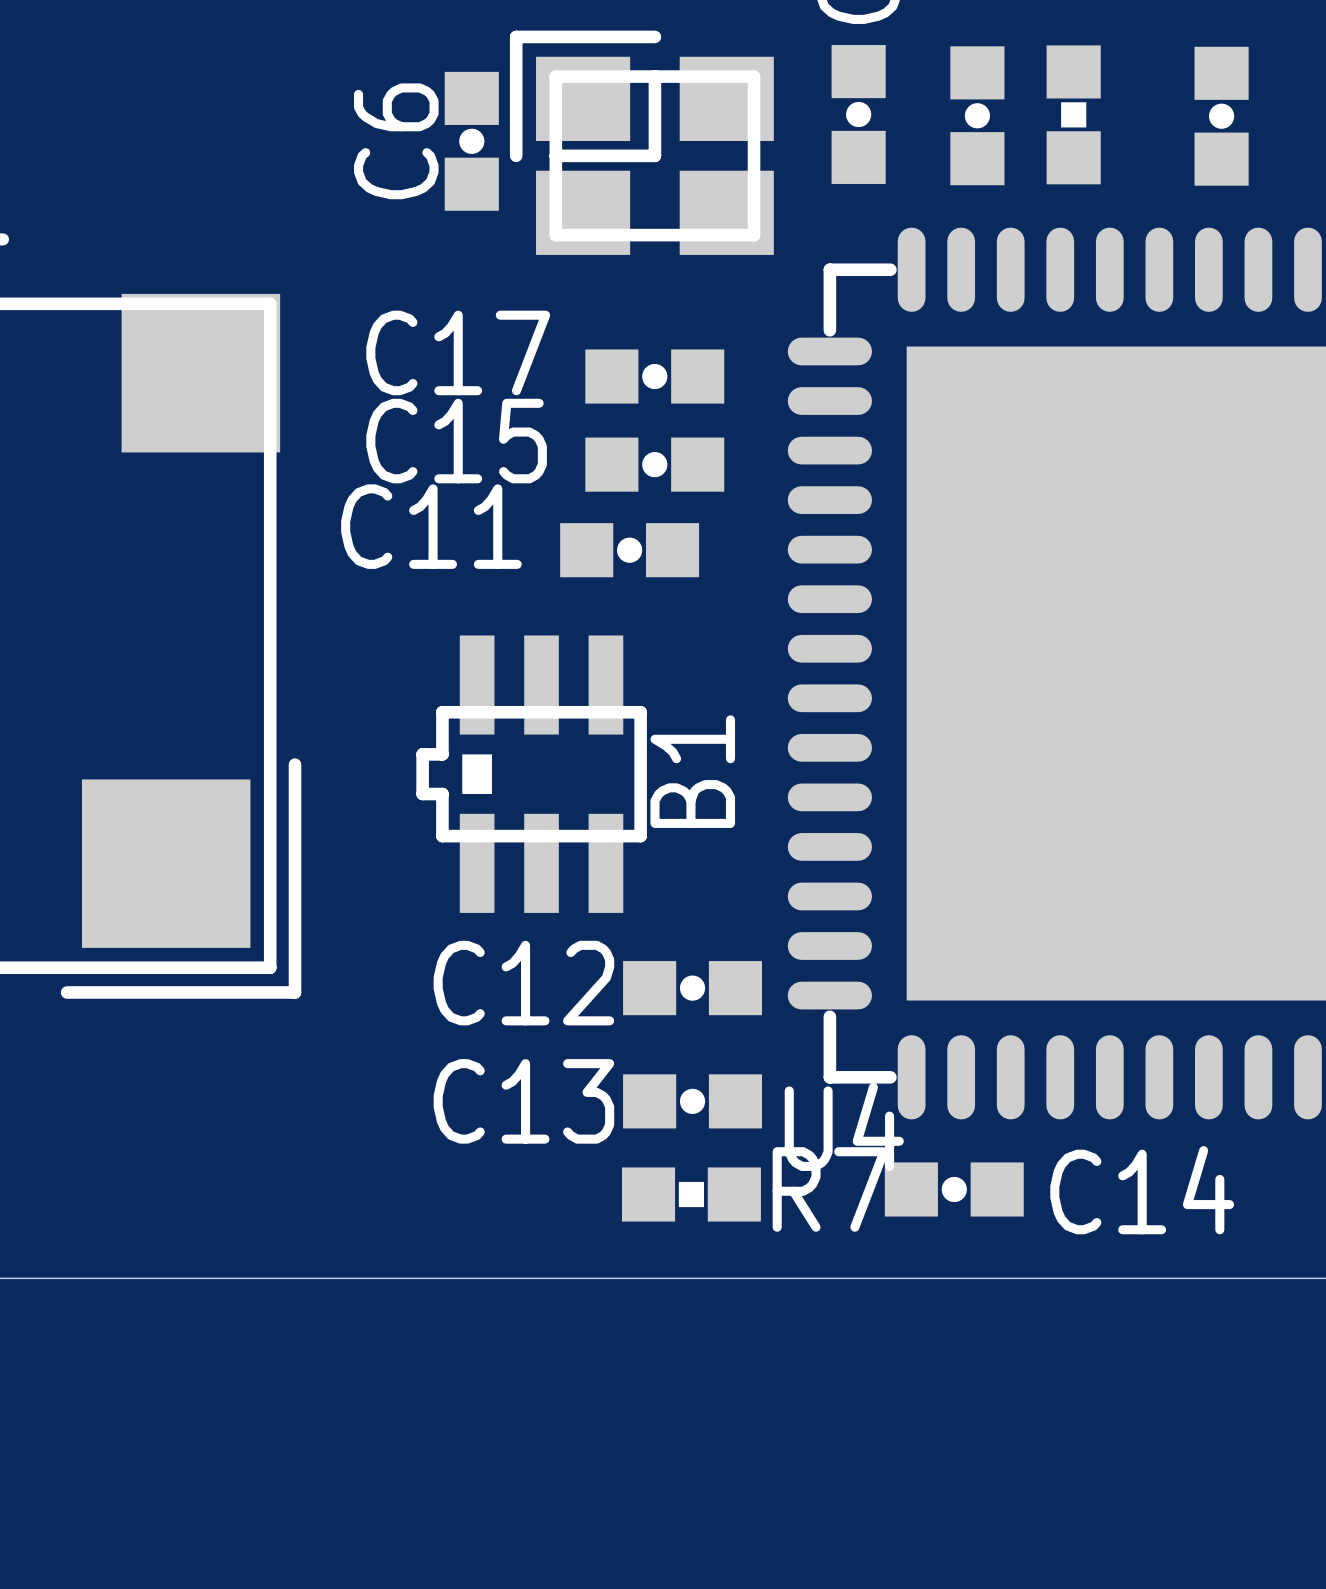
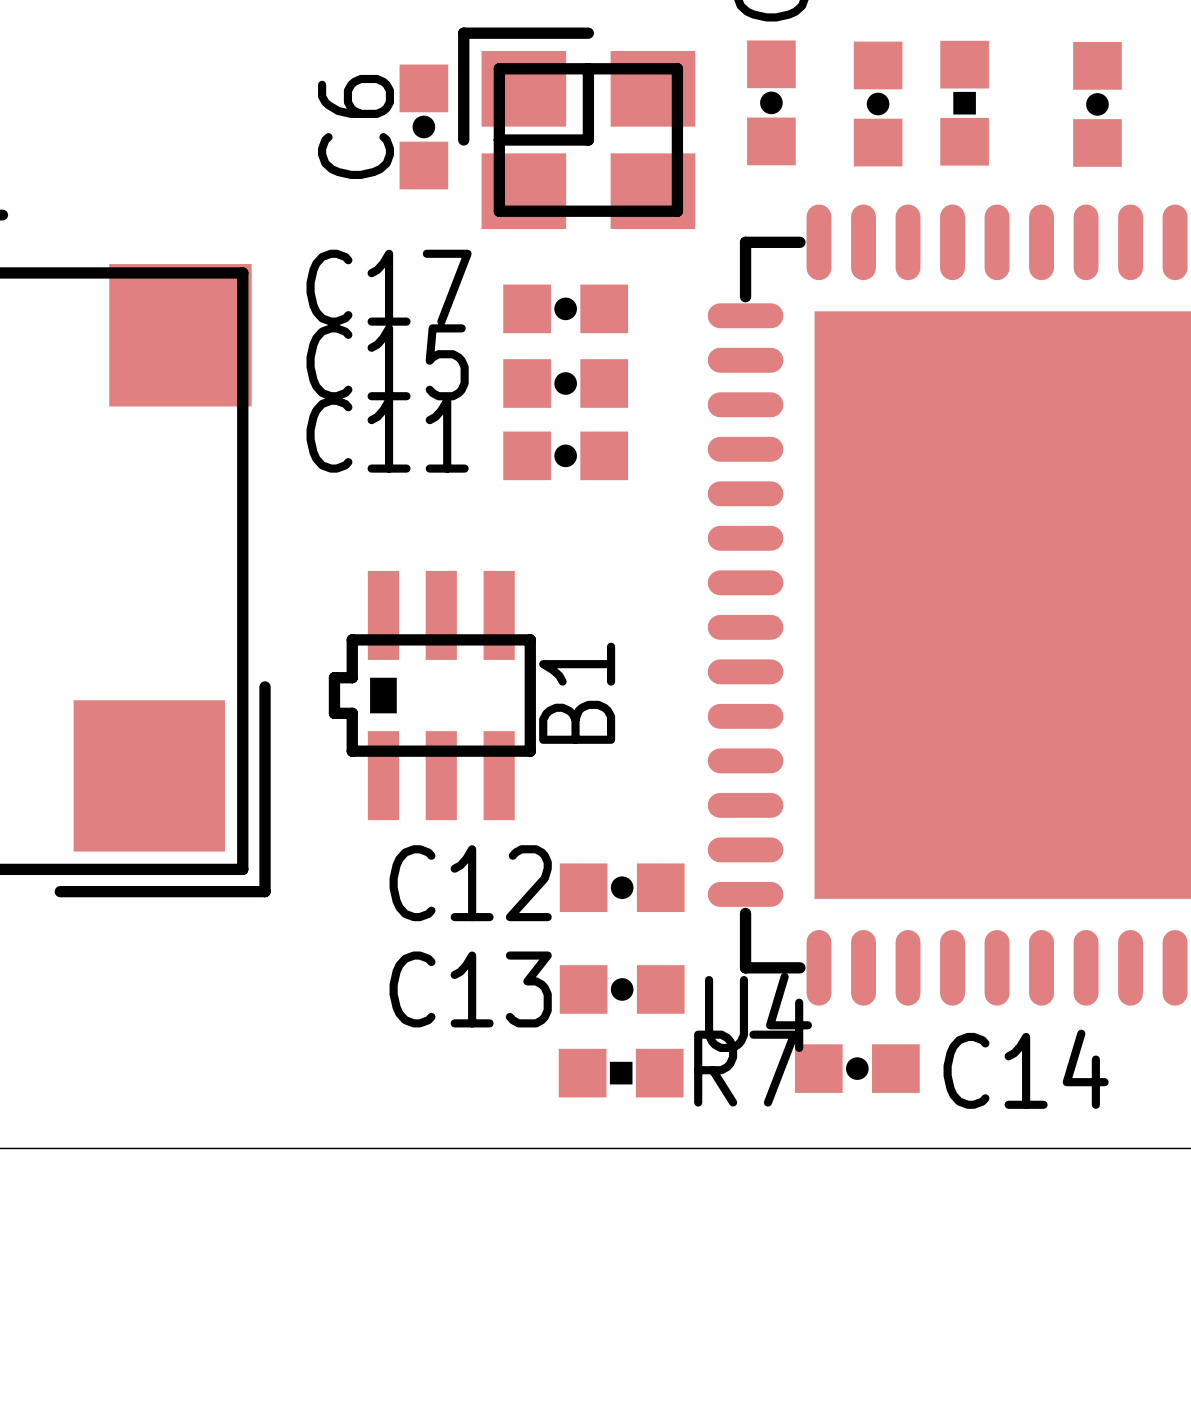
C17 position: (654, 376) -> (565, 308)
C15 position: (654, 464) -> (565, 383)
C11 position: (629, 550) -> (565, 455)
B1 position: (531, 774) -> (432, 695)

